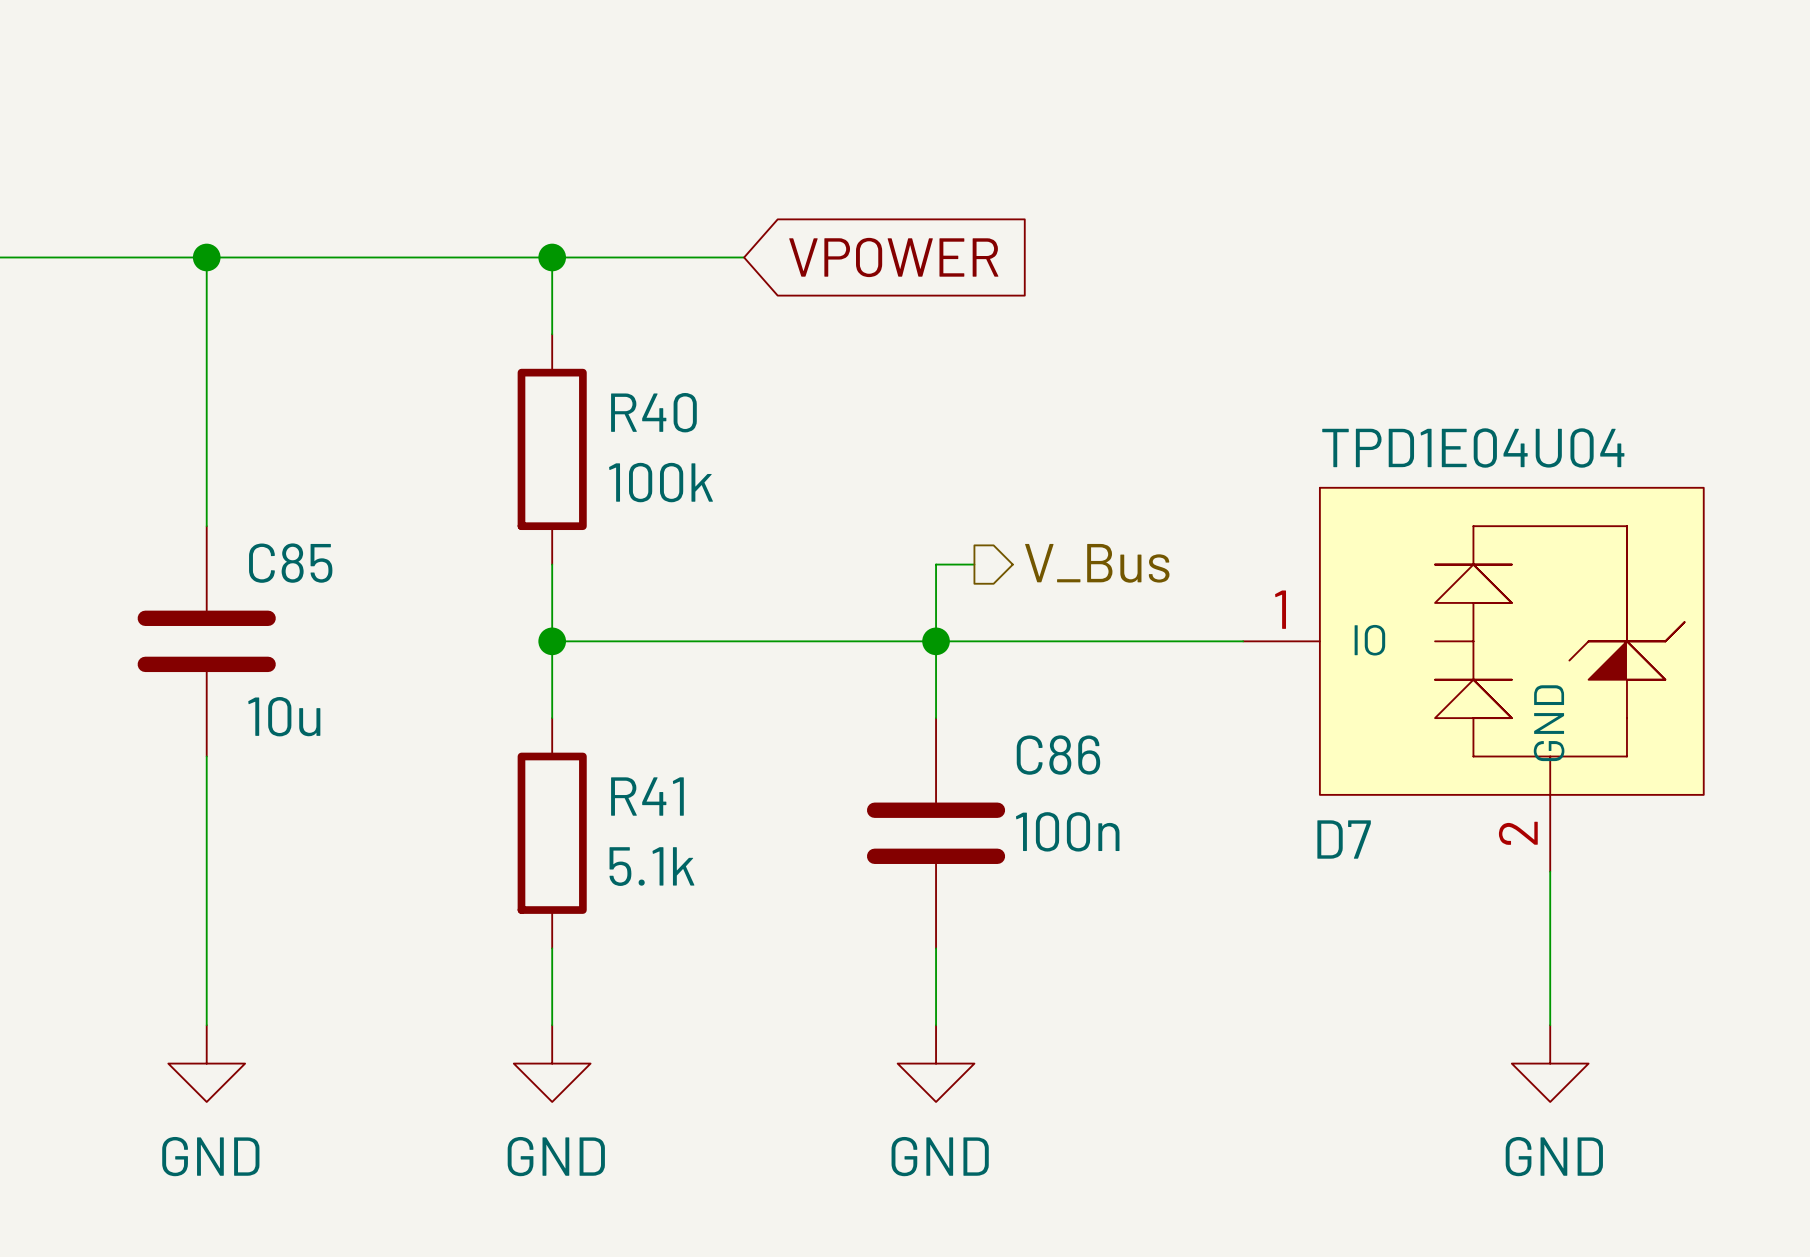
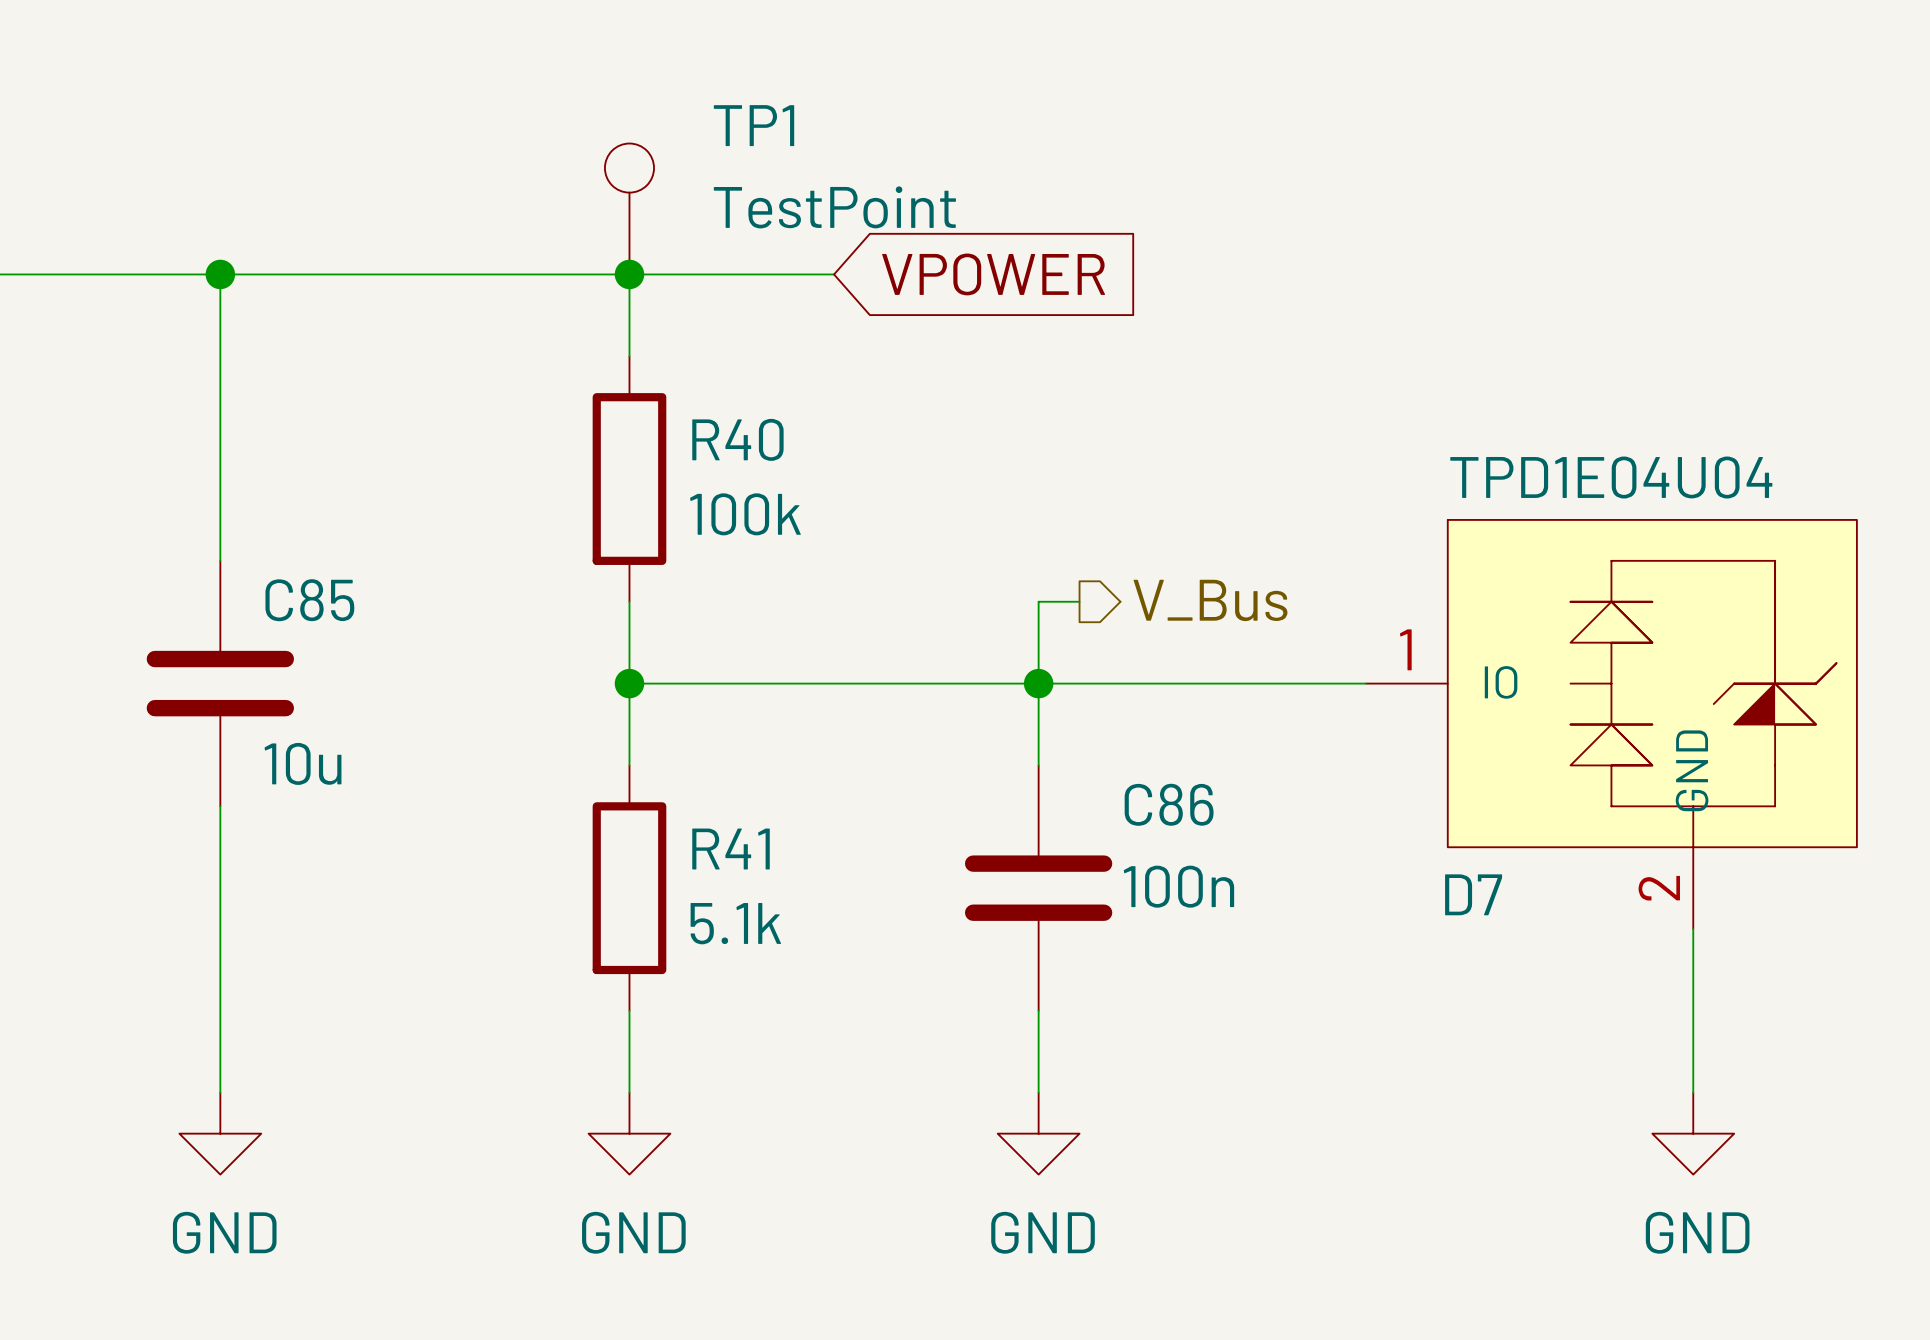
TP1: none -> TestPoint (629, 208)
wire: (552, 257) (552, 334) -> (629, 274) (629, 356)
junction position: (552, 257) -> (629, 274)
global label position: VPOWER (893, 257) -> VPOWER (993, 274)
R40 position: (552, 449) -> (629, 479)
hierarchical label position: V_Bus (1097, 563) -> V_Bus (1210, 600)
wire: (552, 564) (552, 718) -> (629, 601) (629, 765)
wire: (974, 564) (936, 564) (936, 718) -> (1079, 601) (1038, 601) (1038, 765)
wire: (552, 641) (590, 641) -> (793, 274) (834, 274)
junction position: (552, 641) -> (629, 683)
junction position: (936, 641) -> (1038, 683)
D7 position: (1473, 679) -> (1611, 724)
R41 position: (552, 833) -> (629, 888)
C86 position: (936, 833) -> (1038, 888)
wire: (1550, 871) (1550, 1025) -> (1693, 929) (1693, 1092)
wire: (552, 948) (552, 1025) -> (629, 1010) (629, 1092)
wire: (936, 948) (936, 1025) -> (1038, 1010) (1038, 1092)
power symbol position: GND (552, 1063) -> GND (629, 1133)
power symbol position: GND (936, 1063) -> GND (1038, 1133)
power symbol position: GND (1550, 1063) -> GND (1693, 1133)

